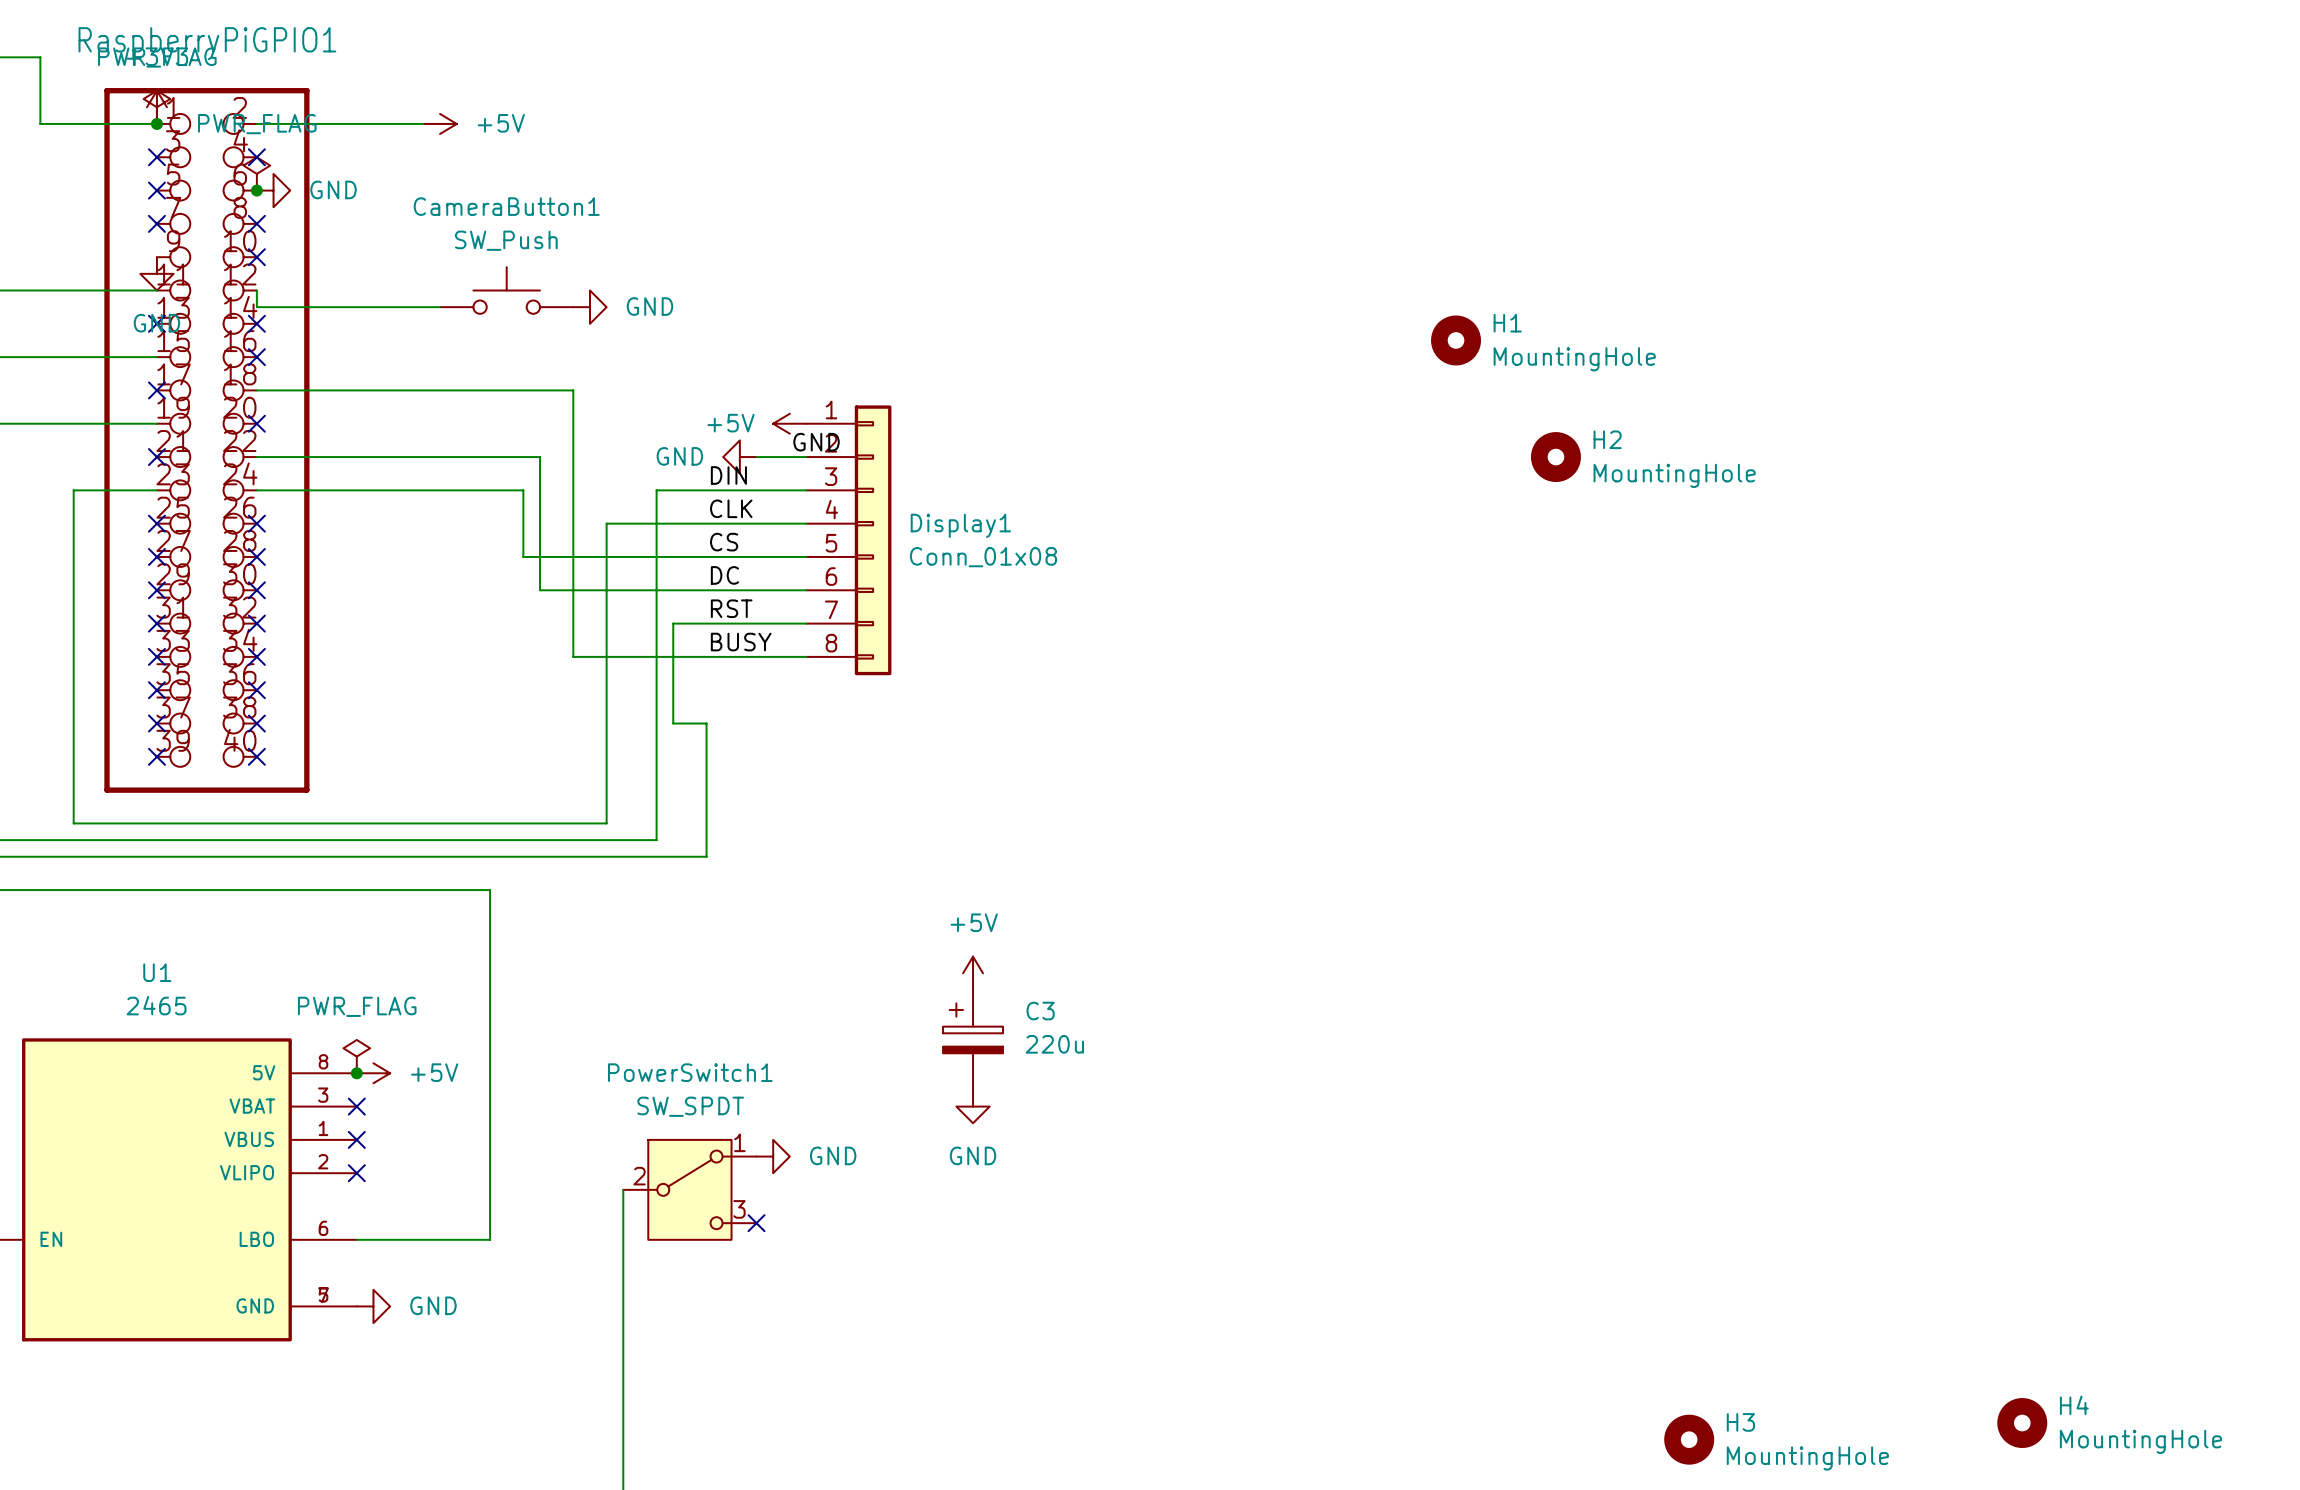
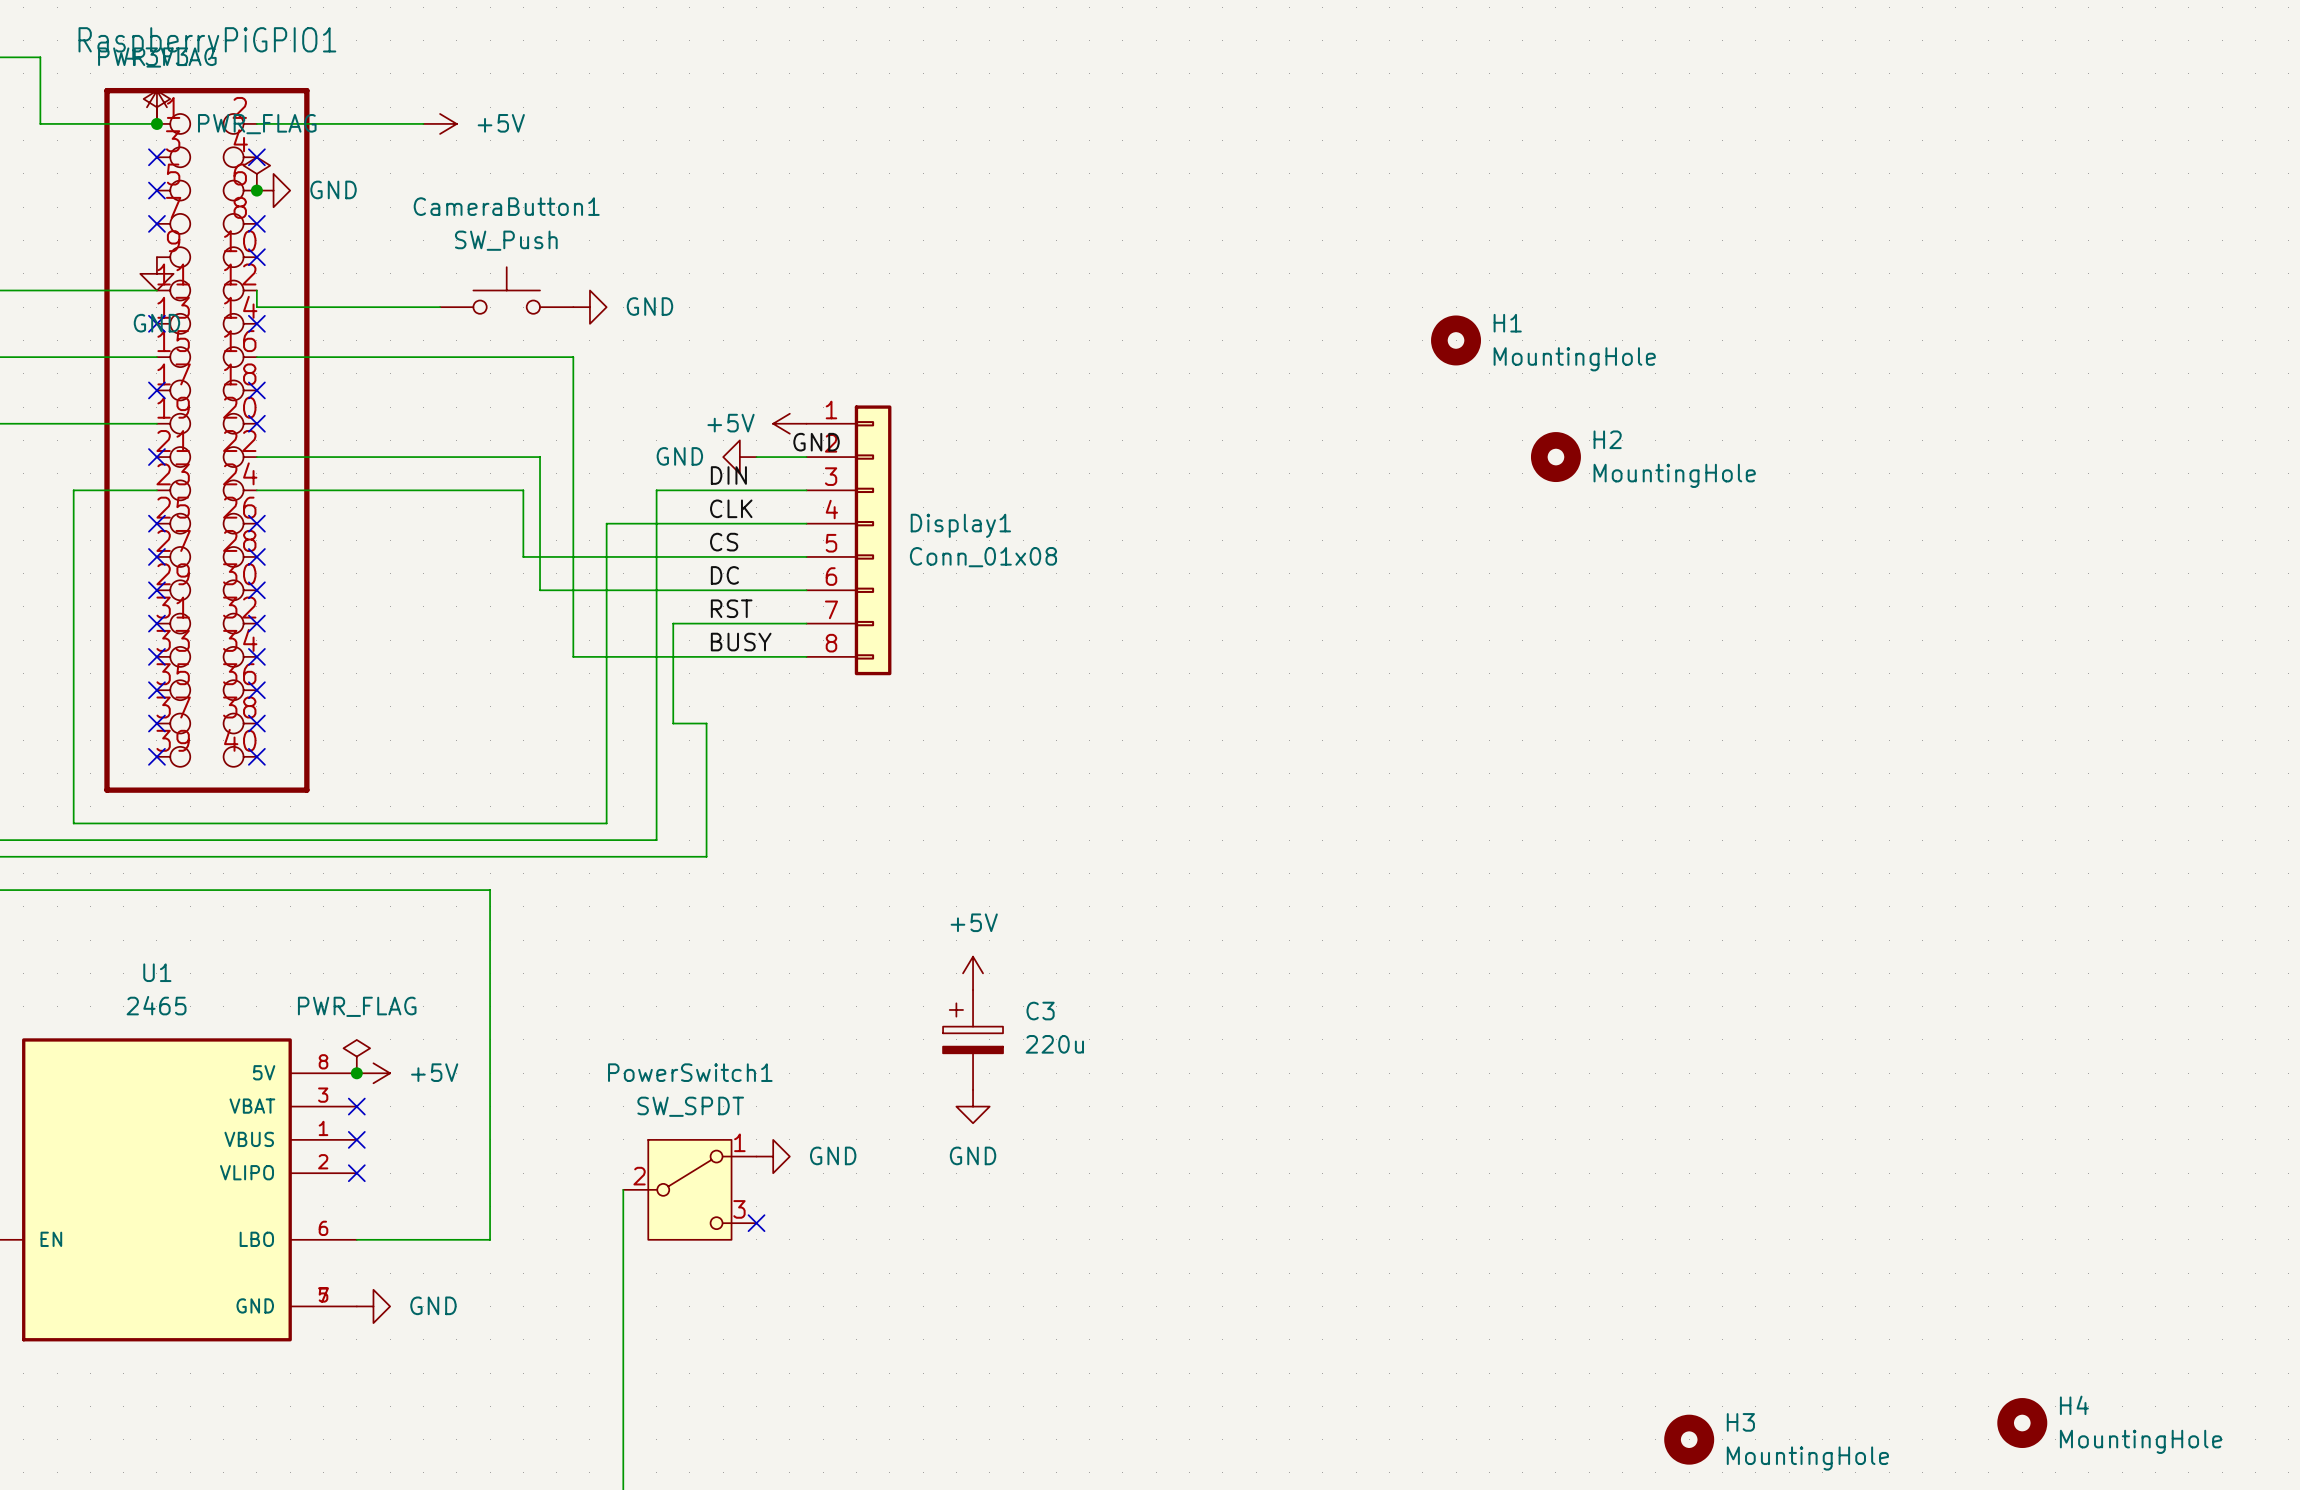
no-connect mark position: (256, 357) -> (256, 390)
wire: (256, 390) (573, 390) -> (256, 357) (573, 357) (573, 390)

